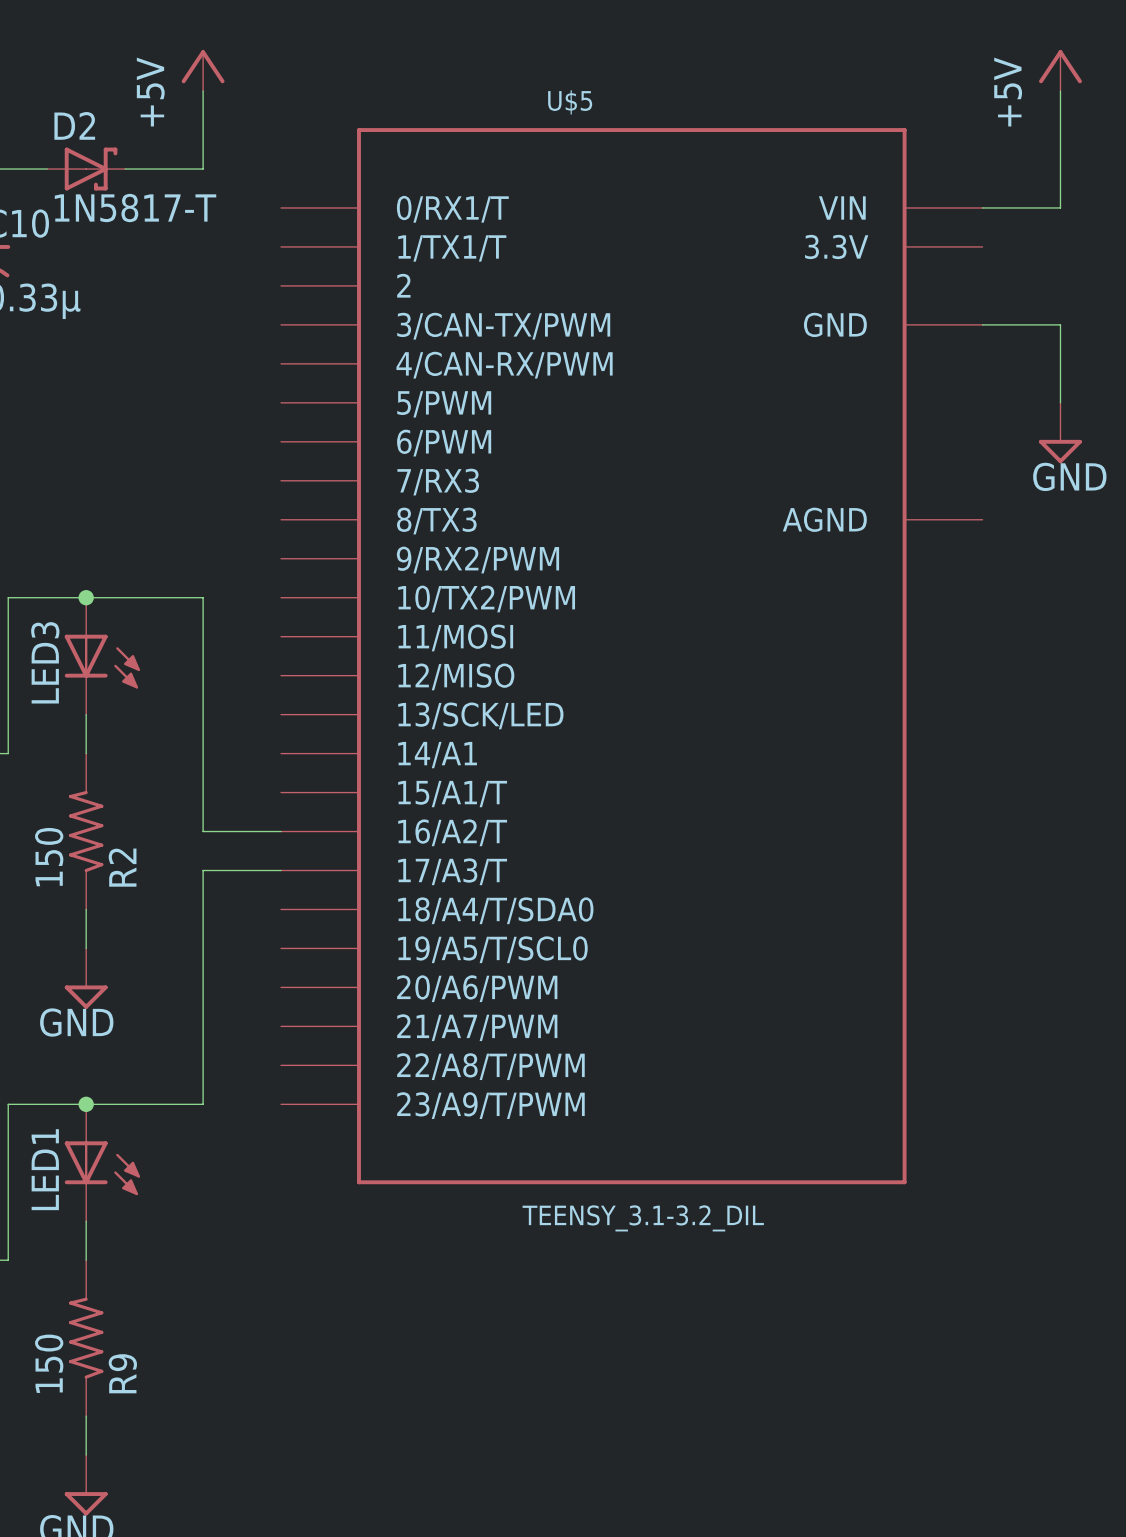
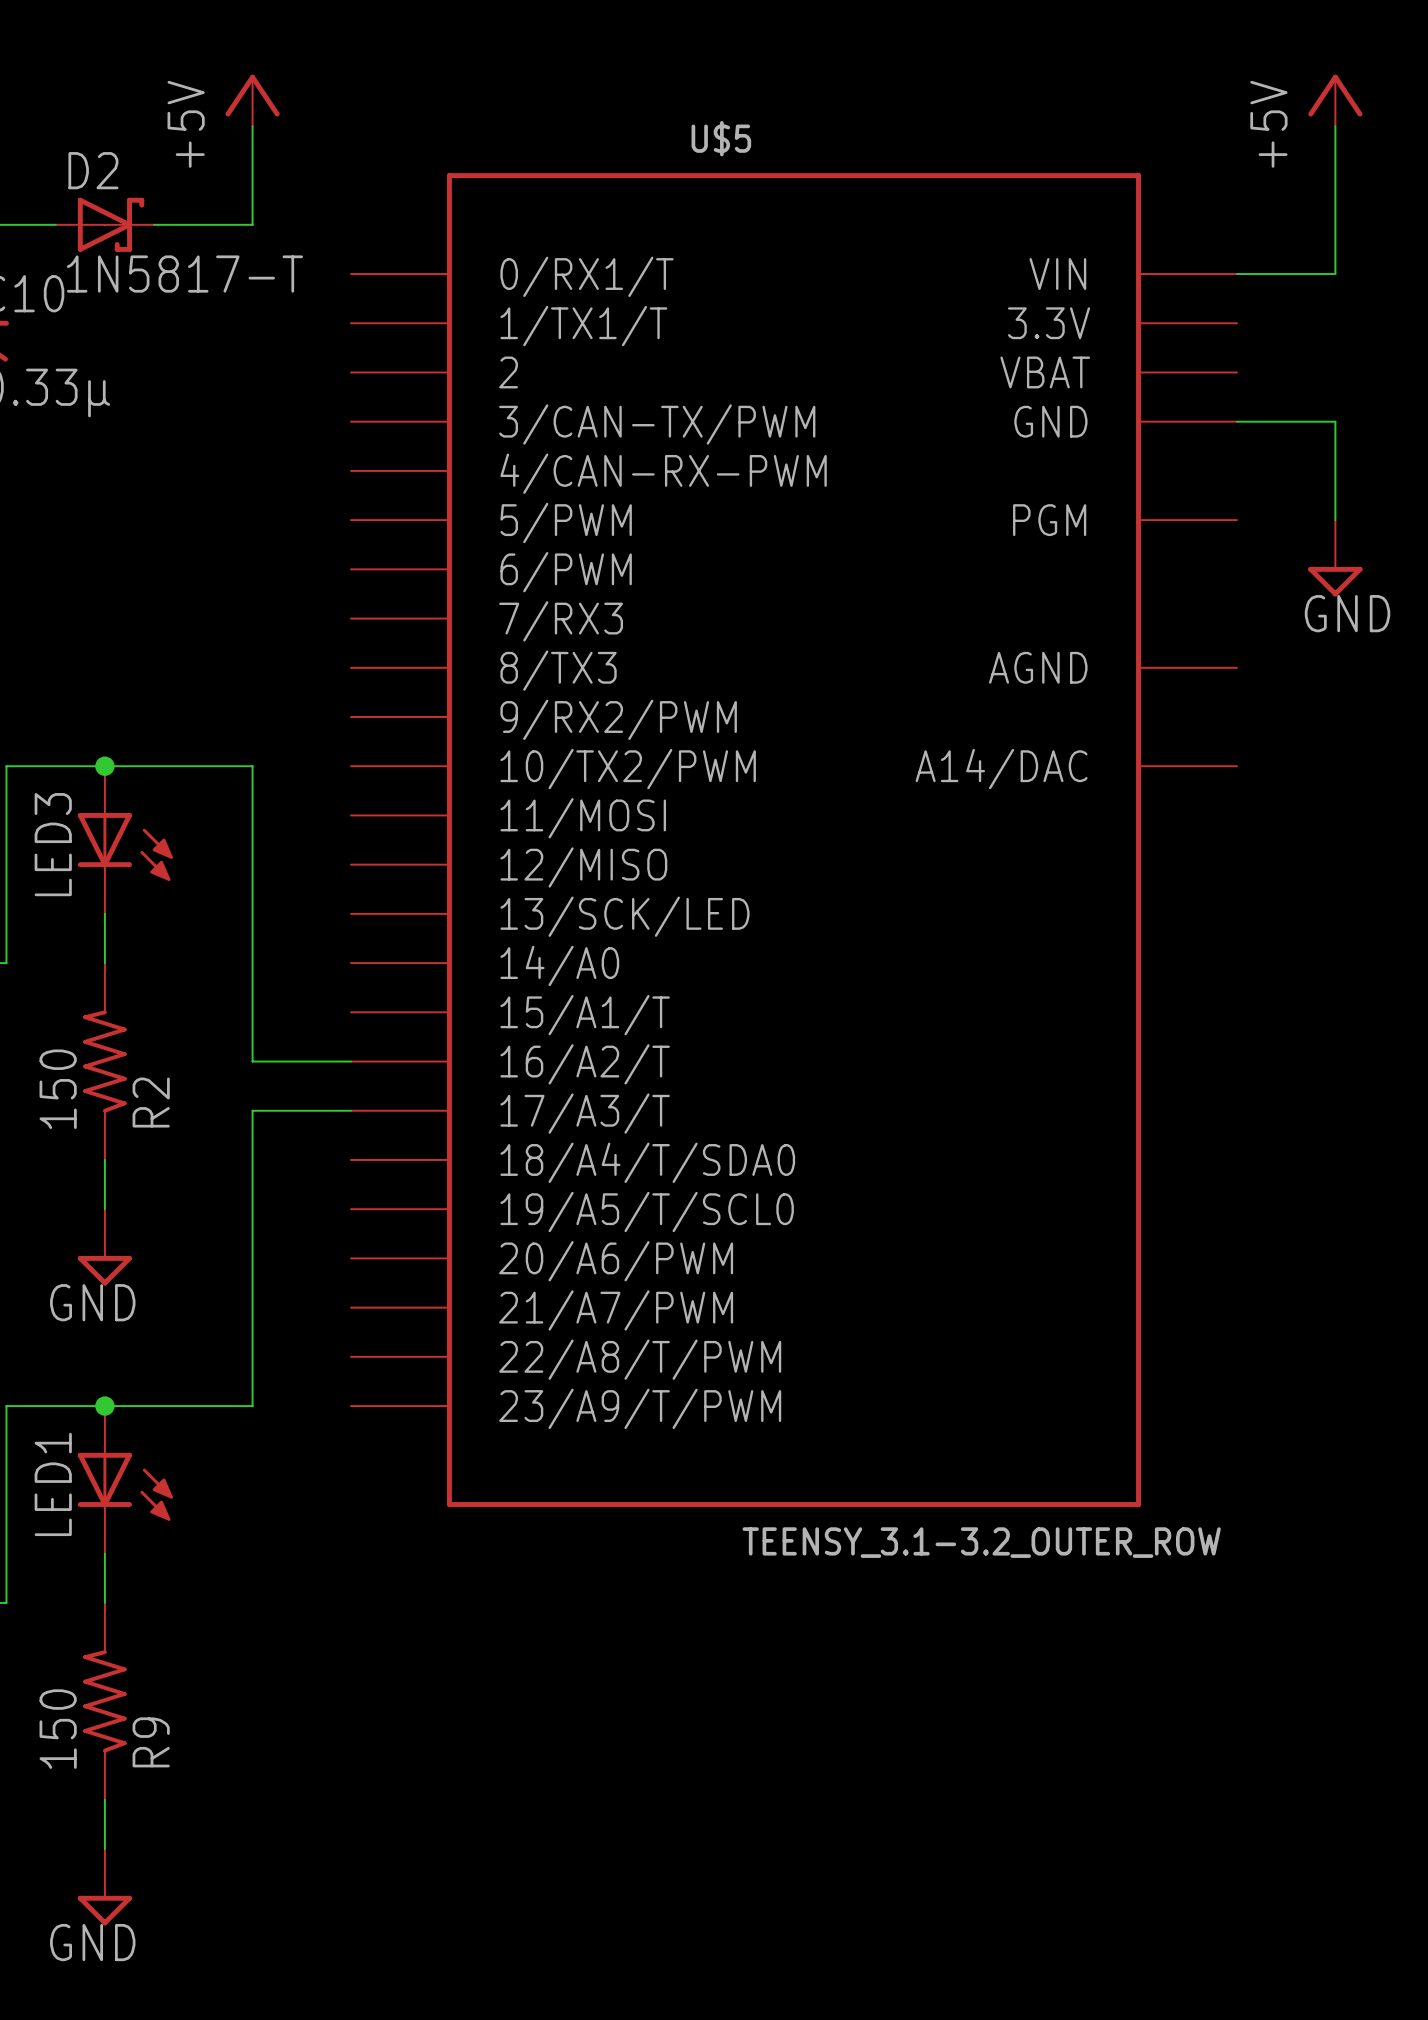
U$5 symbol: [281, 128, 983, 1185] -> [351, 173, 1237, 1507]
U$5 value: TEENSY_3.1-3.2_DIL (643, 1218) -> TEENSY_3.1-3.2_OUTER_ROW (981, 1542)

